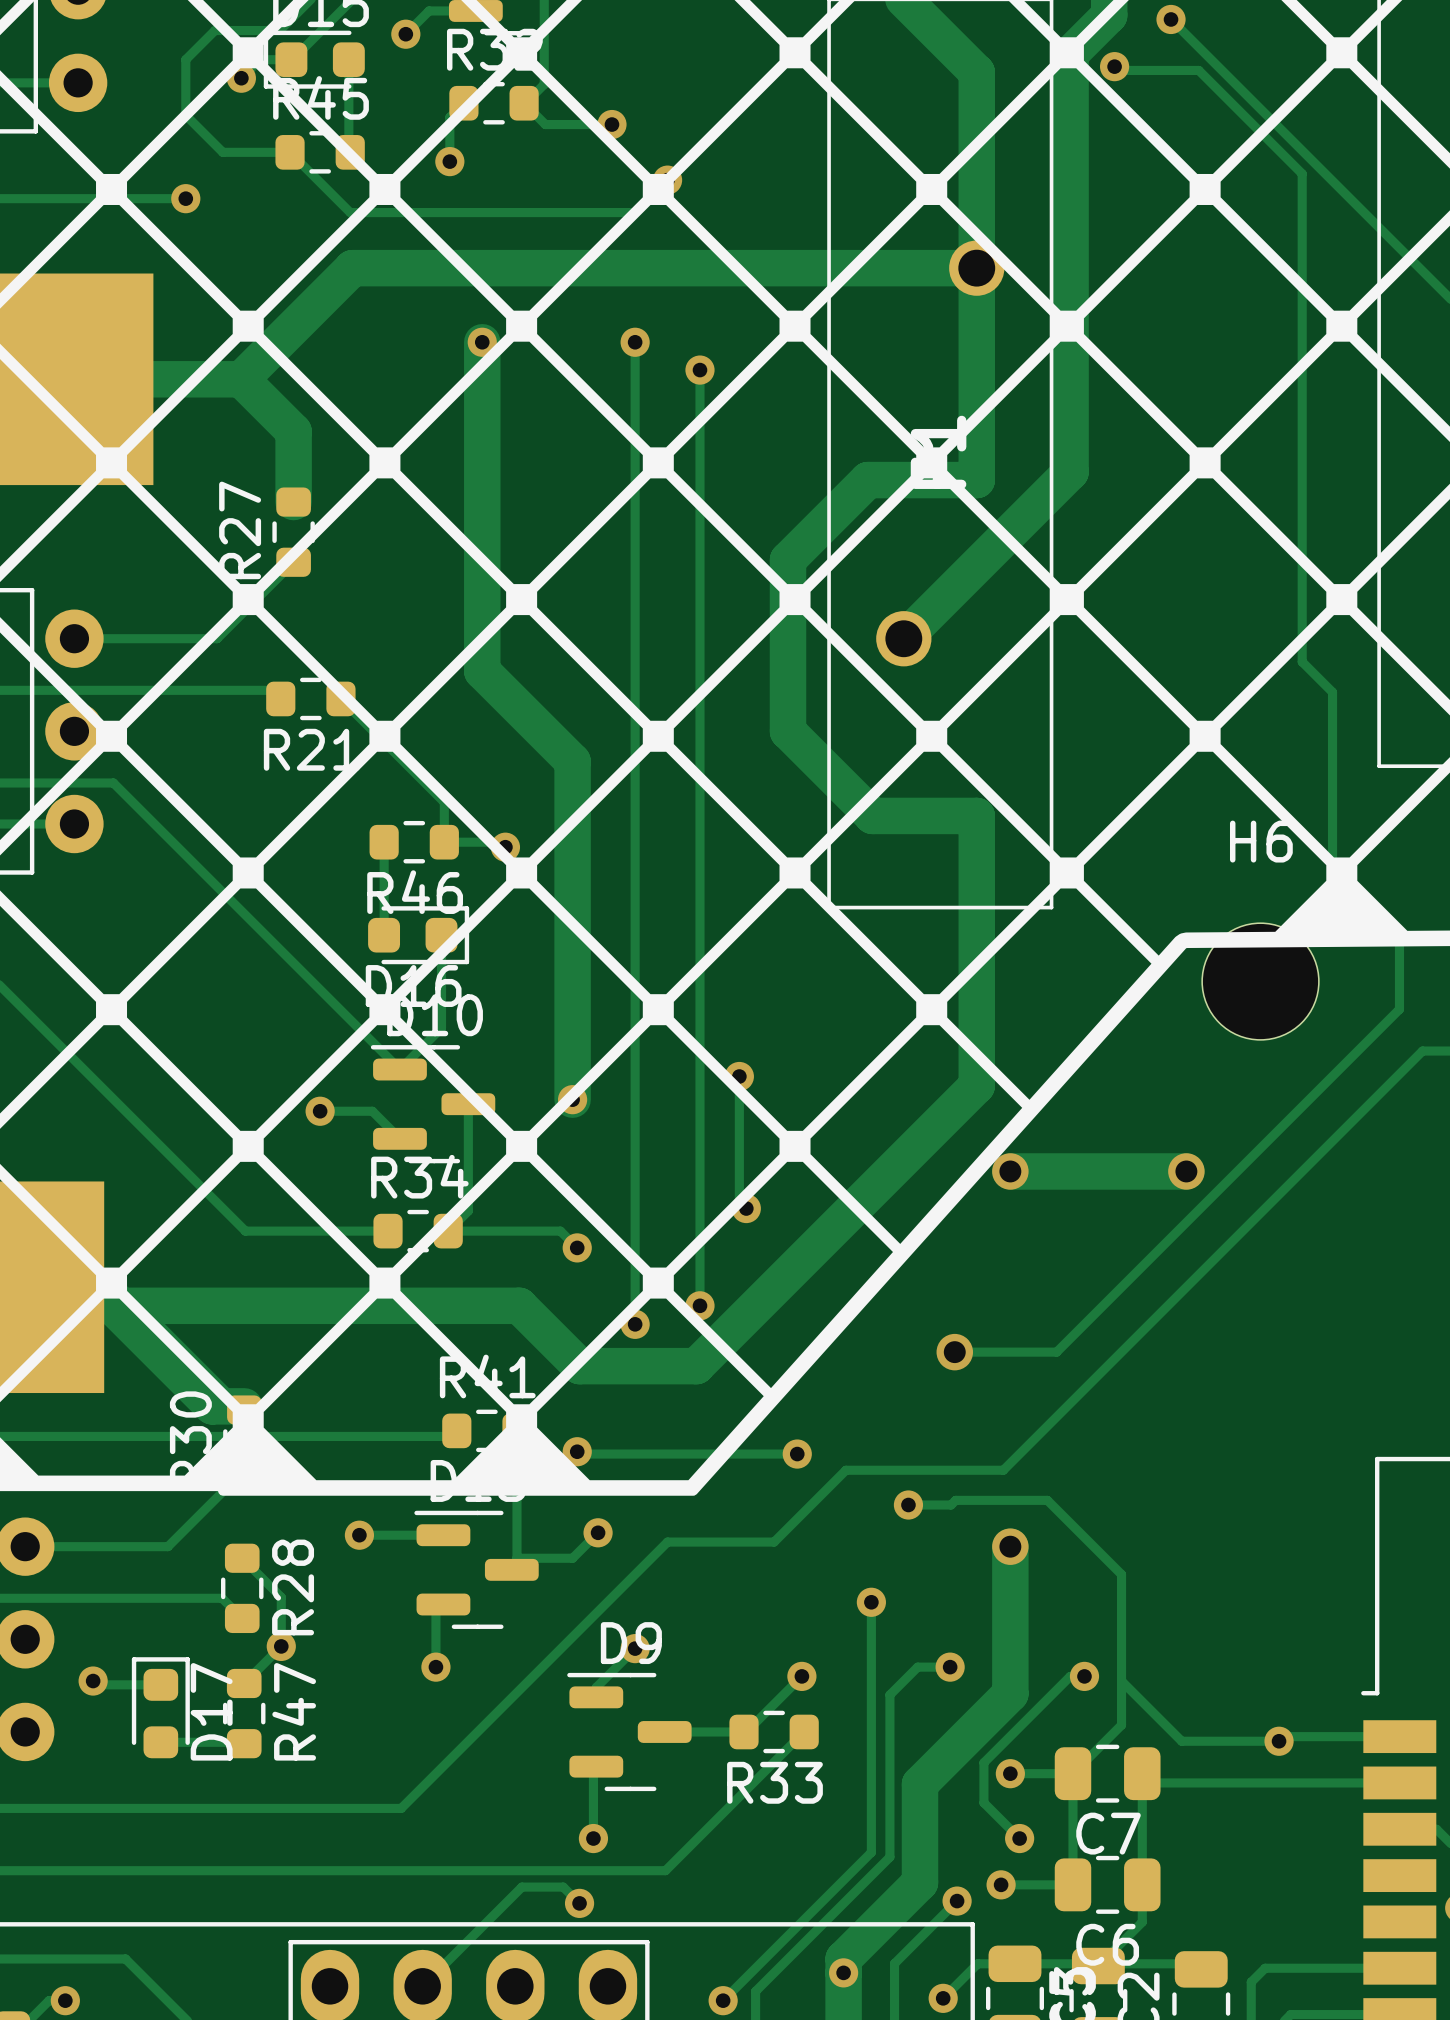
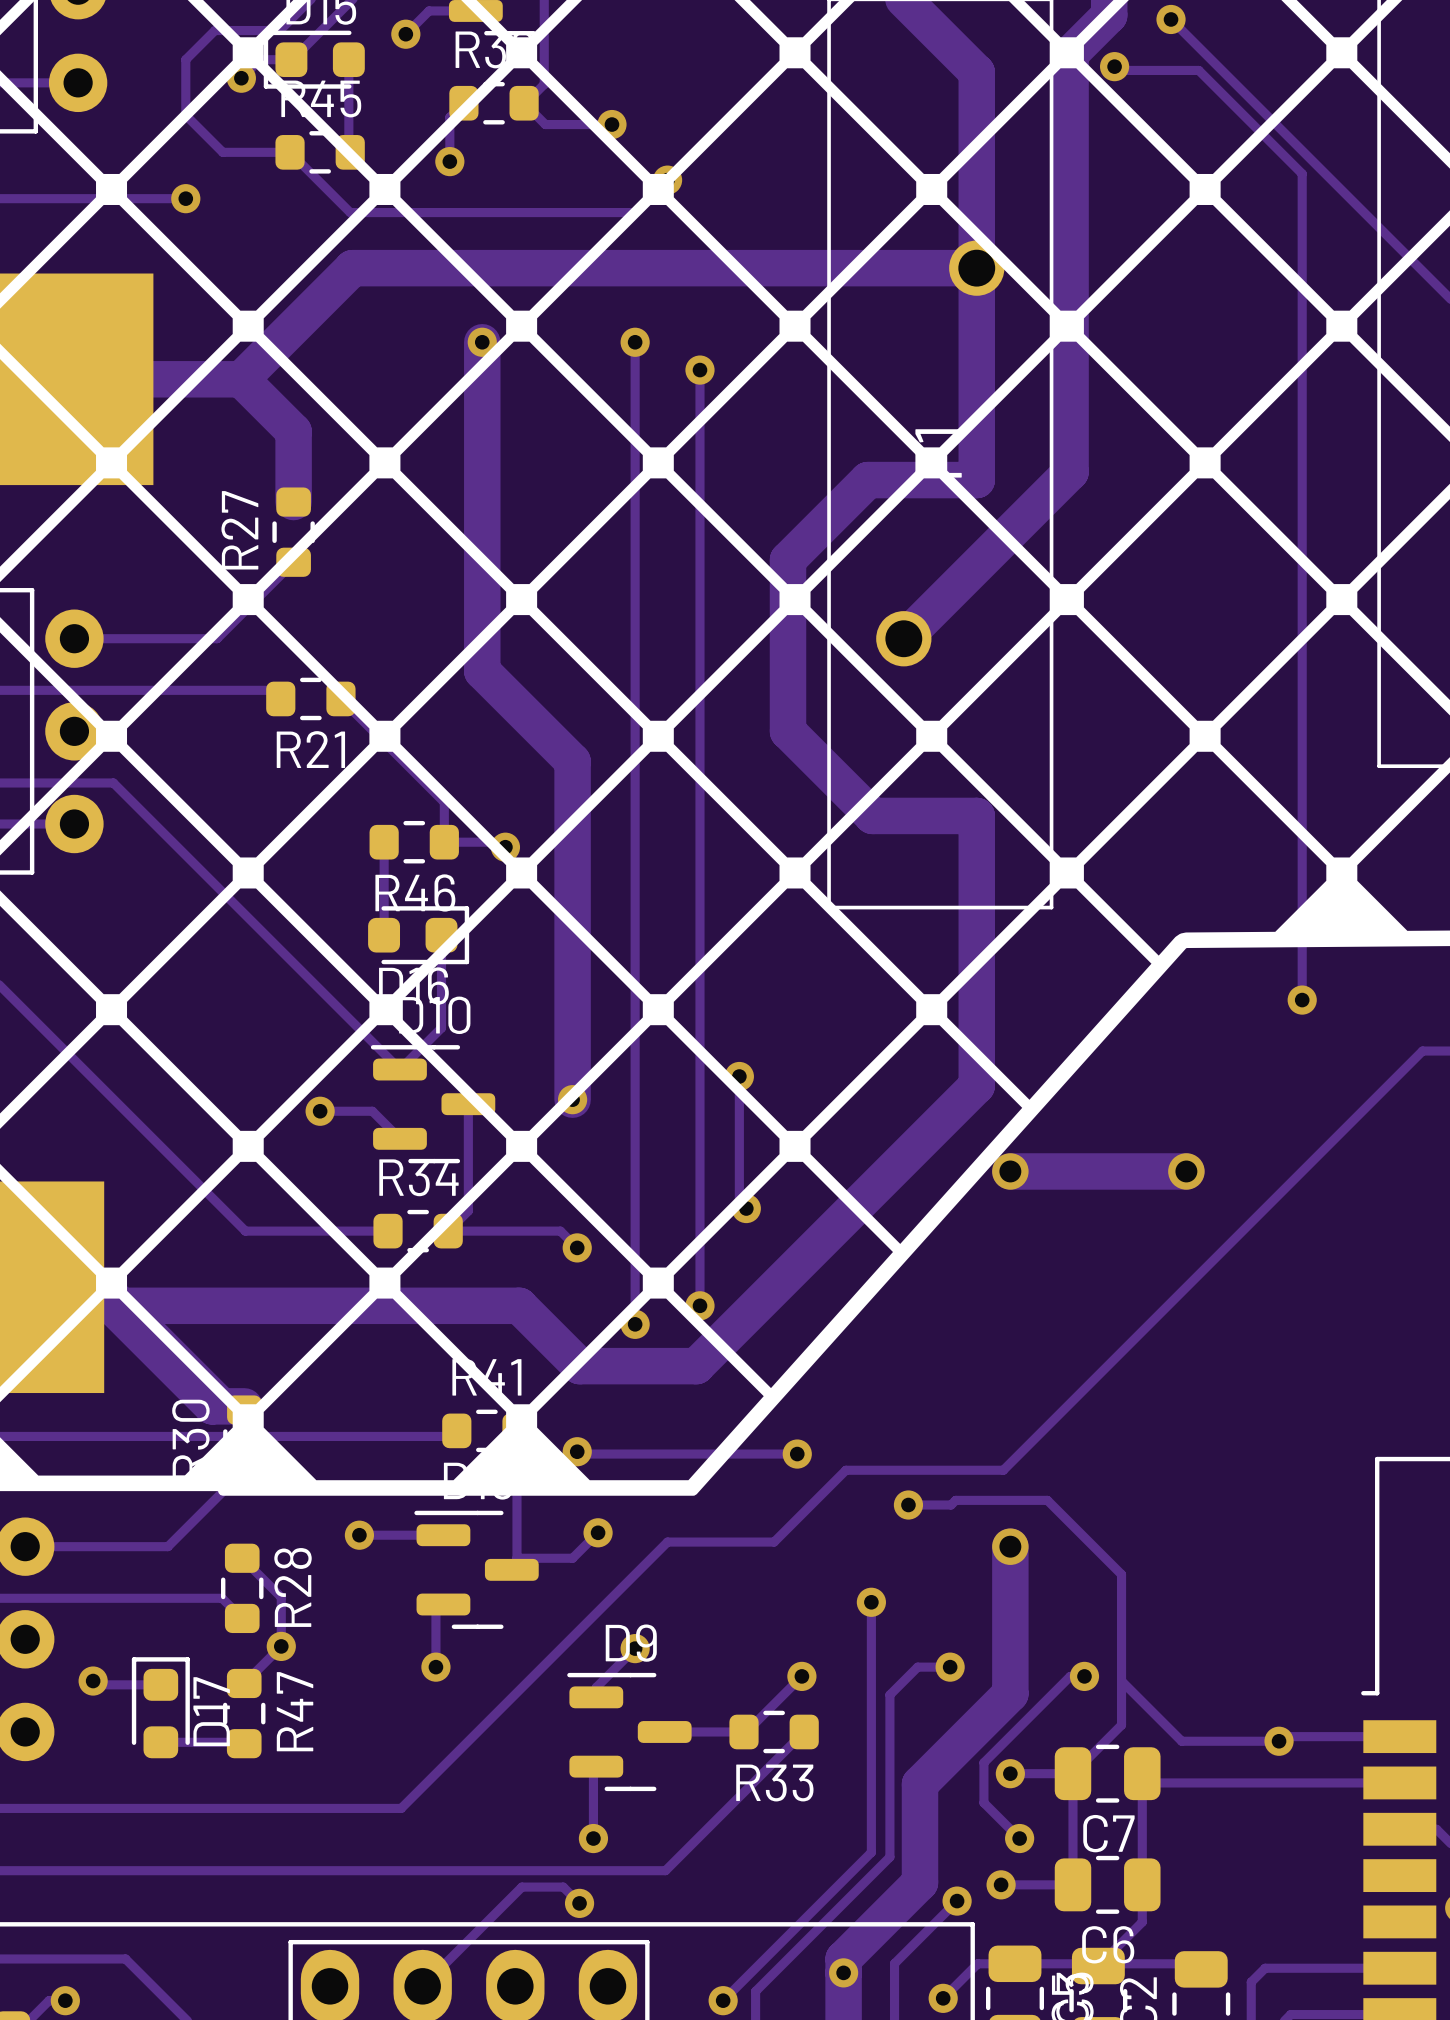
track: (1302, 661) (1332, 692) (1332, 872) (1399, 939) (1399, 1009) (1056, 1352) (954, 1352) -> (1302, 661) (1302, 1000)
H6: (1260, 981) -> none
via: none -> (1302, 1000)
via: (954, 1352) -> none

